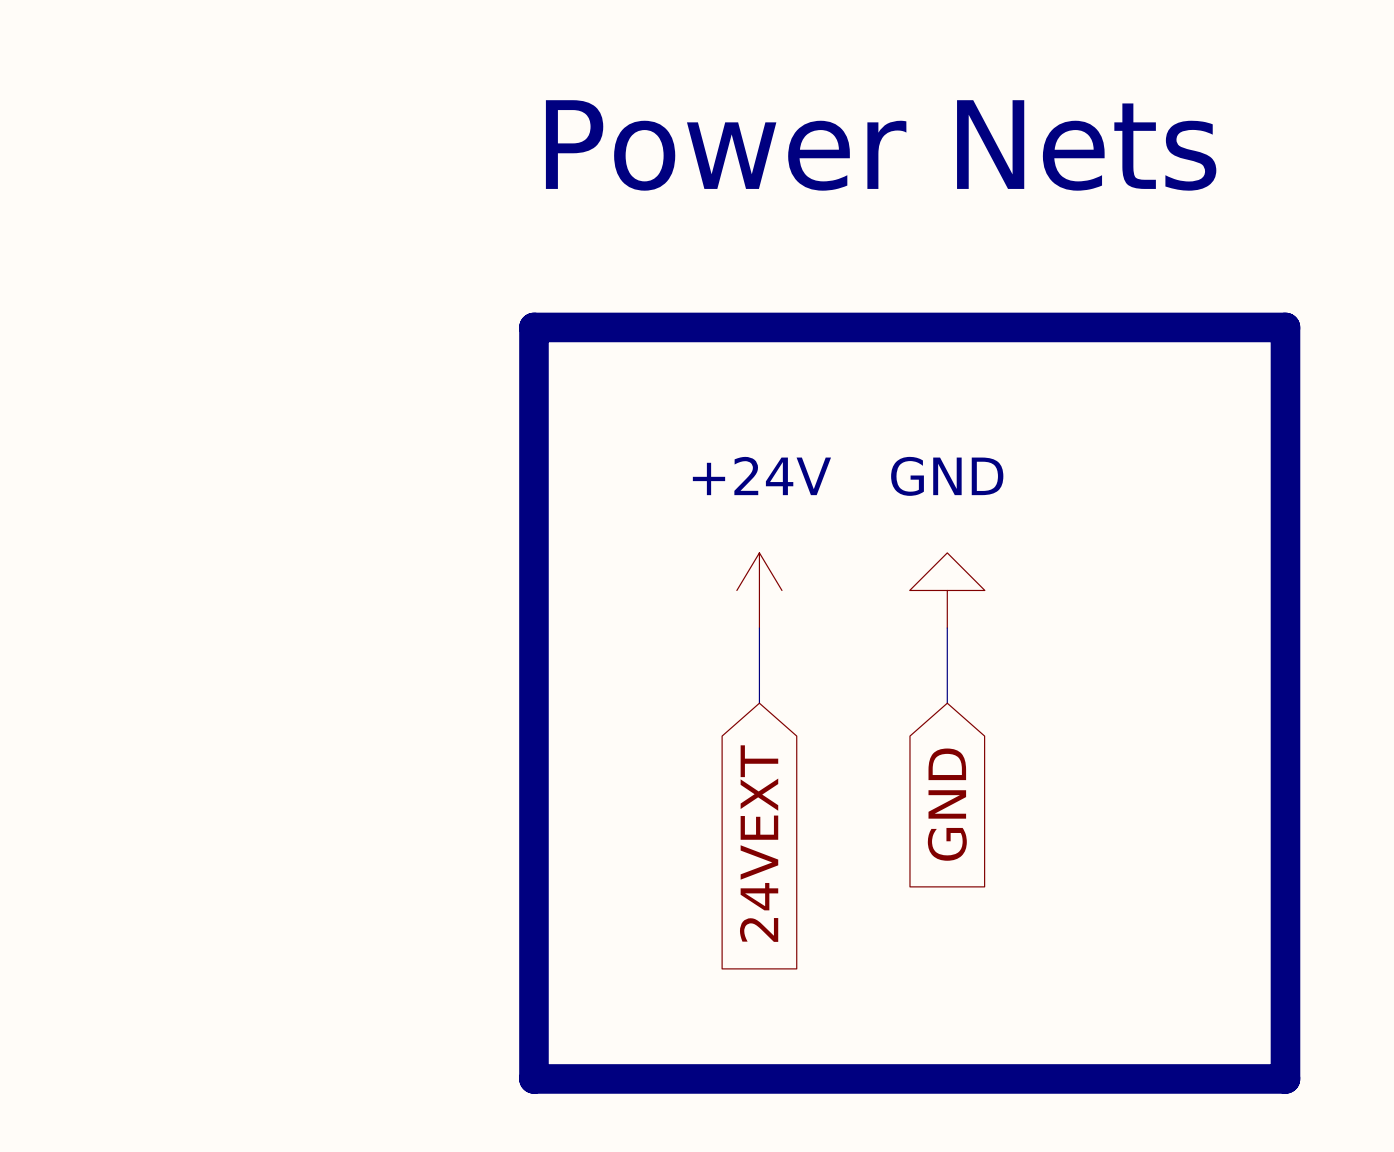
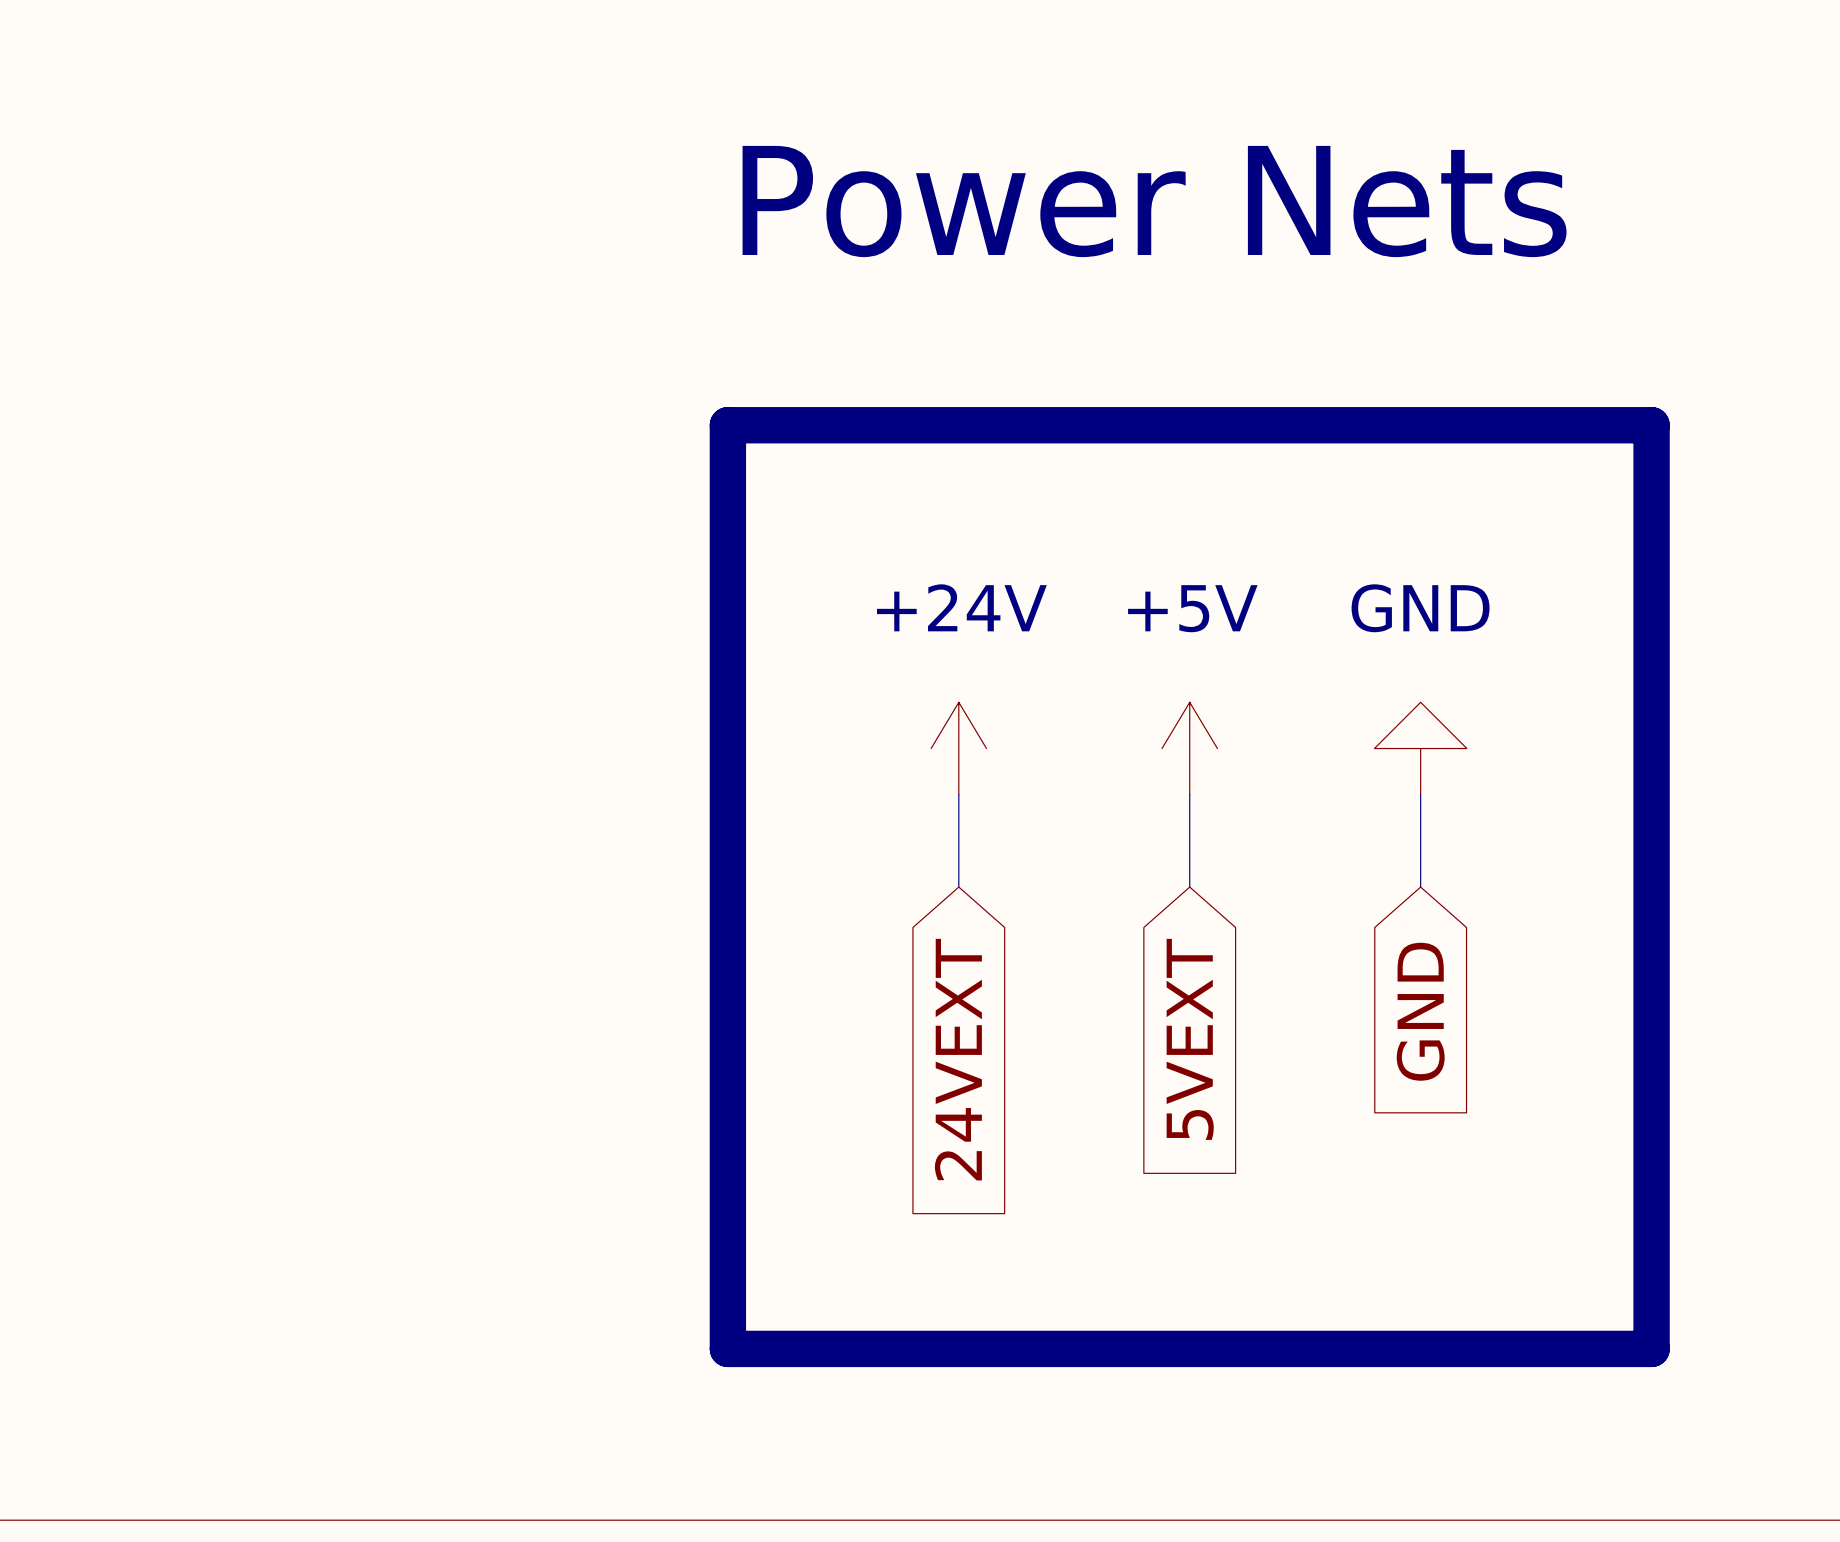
power symbol position: +24V (759, 590) -> +24V (958, 748)
power symbol: none -> +5V (1189, 748)
power symbol position: GND (947, 590) -> GND (1420, 748)
wire: (759, 628) (759, 703) -> (958, 794) (958, 887)
wire: (947, 628) (947, 703) -> (1189, 794) (1189, 887)
wire: none -> (1420, 794) (1420, 887)
global label position: GND (947, 804) -> GND (1420, 1011)
global label: none -> 5VEXT (1190, 1039)
global label position: 24VEXT (759, 843) -> 24VEXT (958, 1059)

